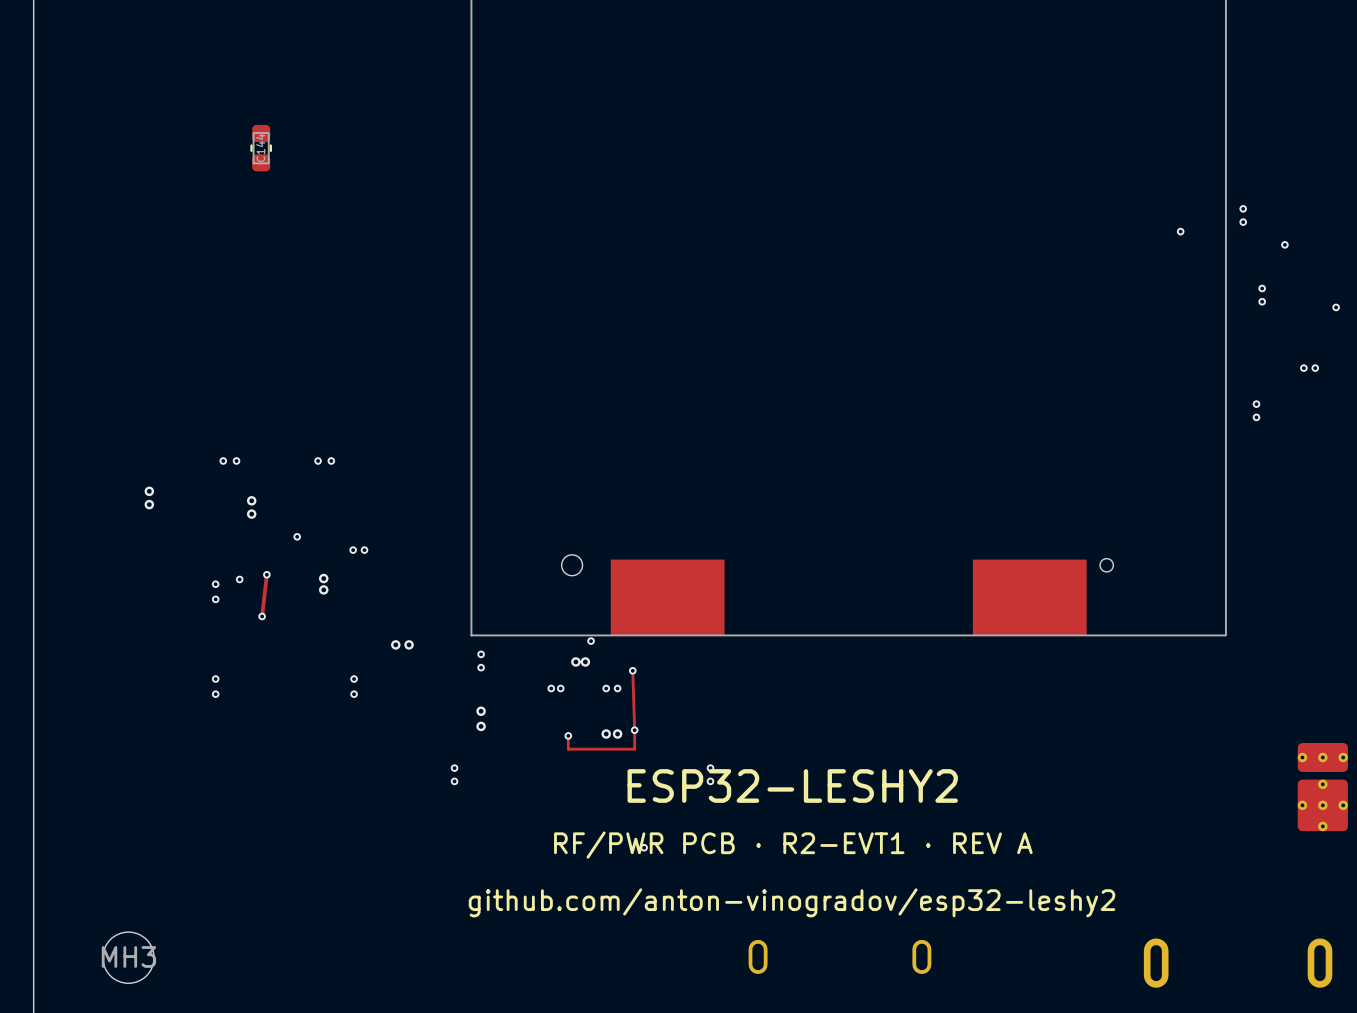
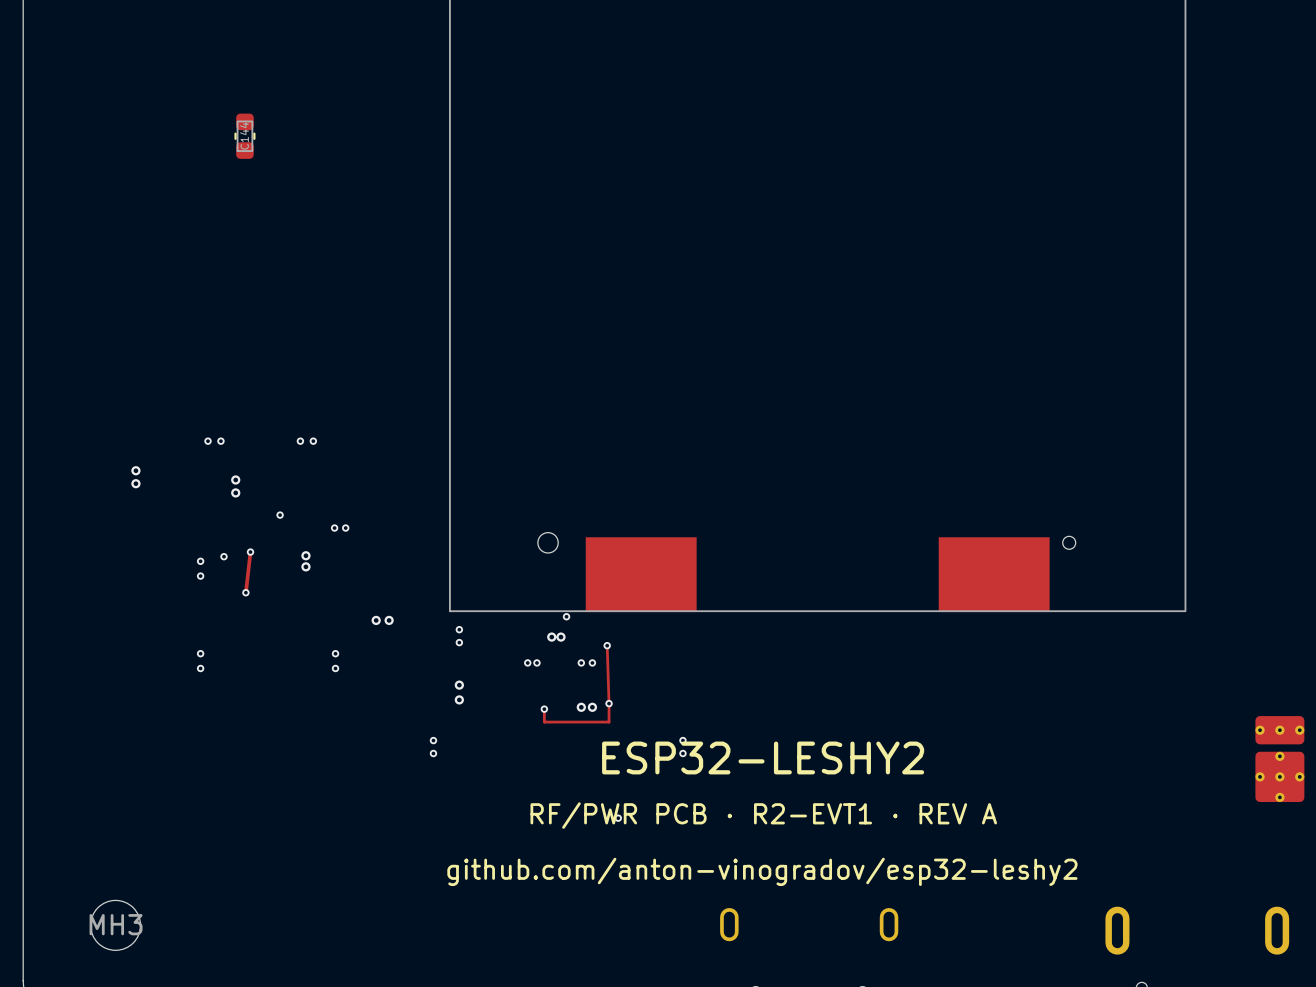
via: (1243, 208) -> none
via: (1243, 222) -> none
via: (1180, 231) -> none
via: (1284, 244) -> none
via: (1262, 288) -> none
via: (1262, 301) -> none
via: (1336, 307) -> none
via: (1303, 368) -> none
via: (1315, 368) -> none
via: (1256, 404) -> none
via: (1256, 417) -> none

